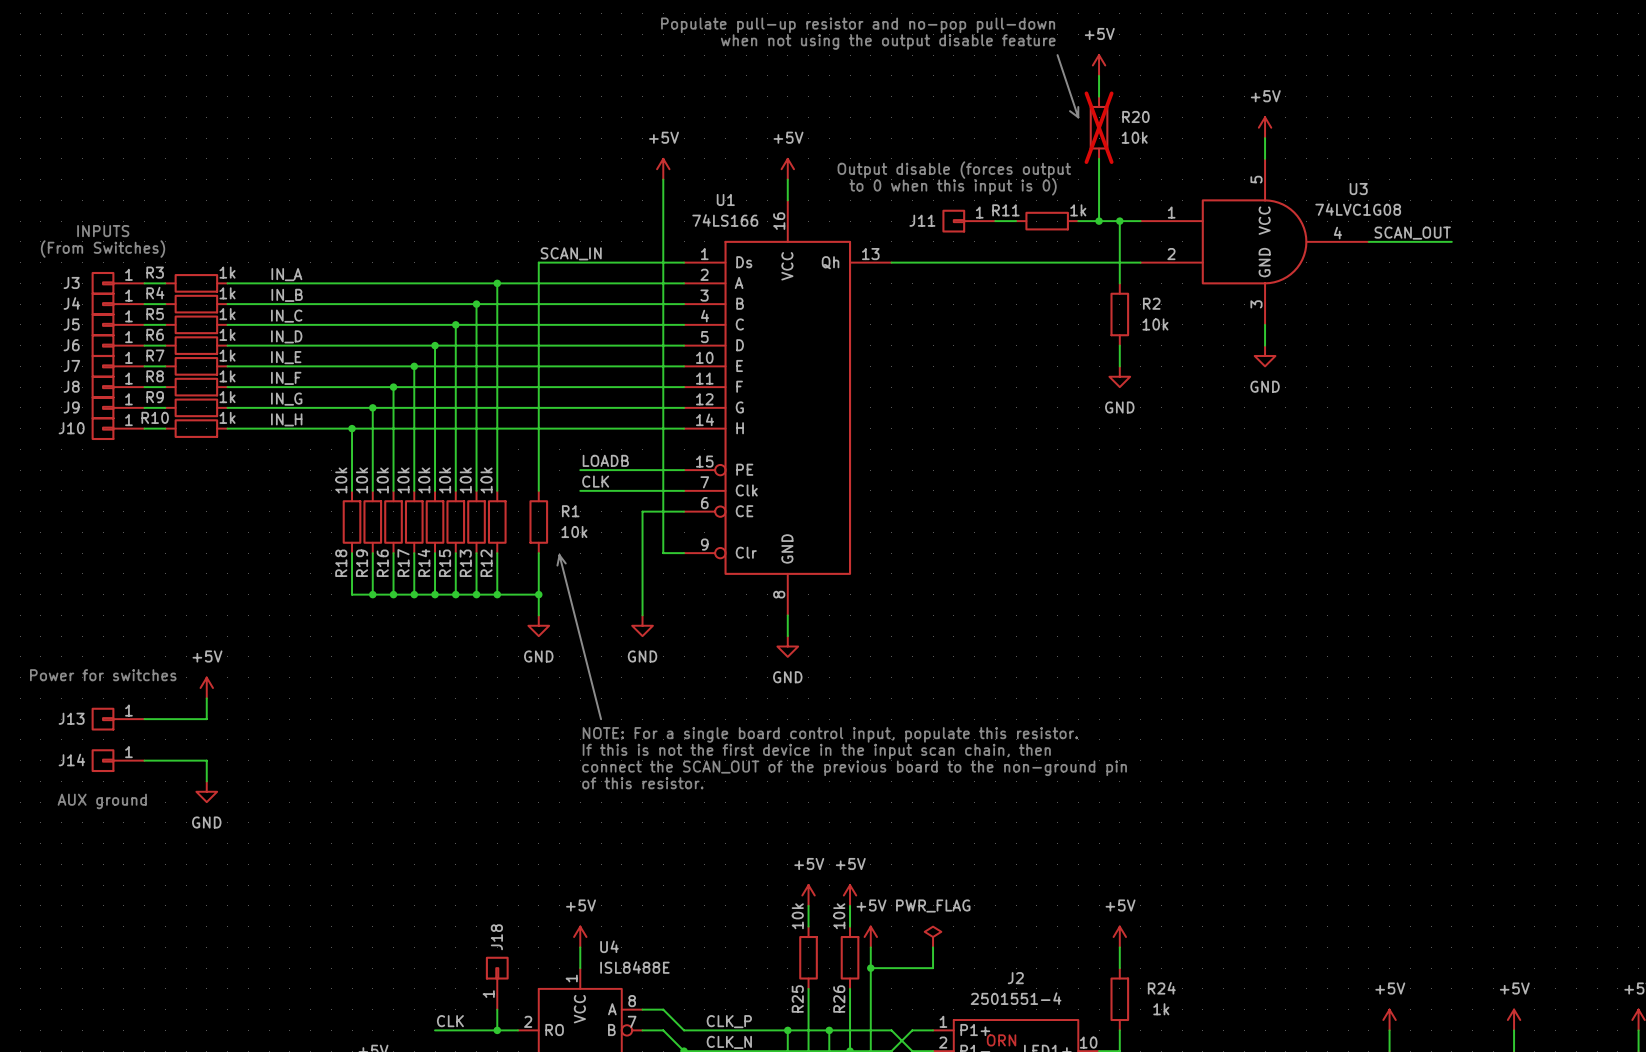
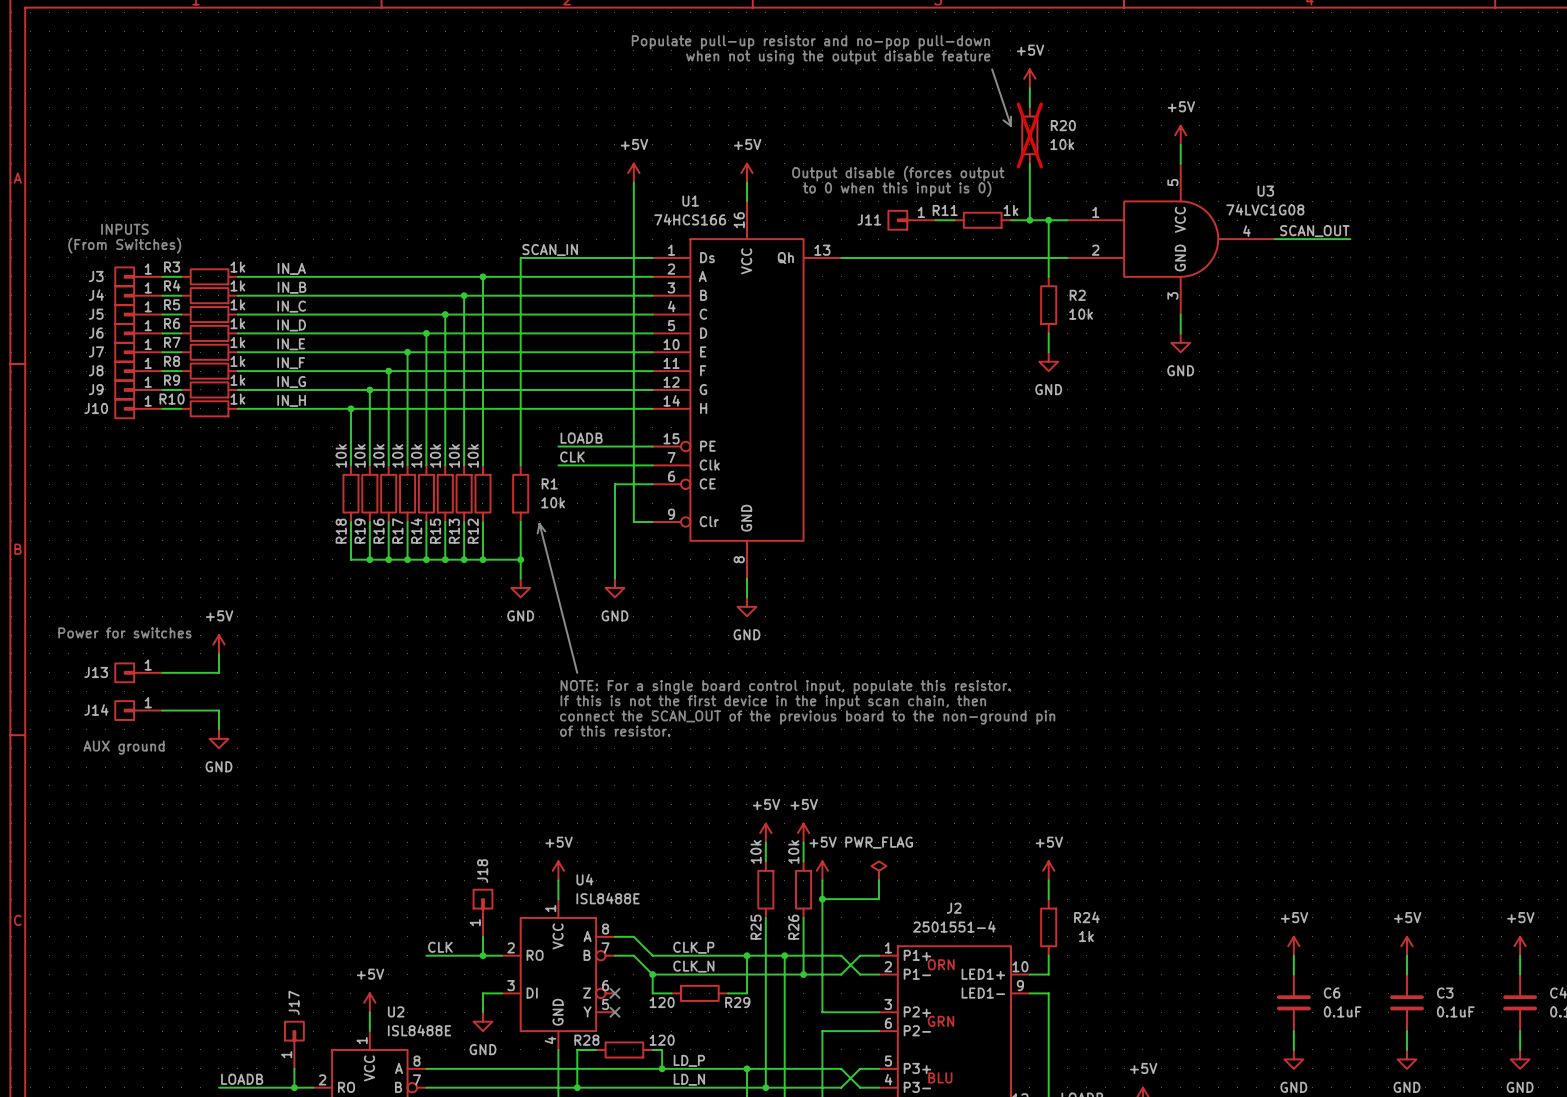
U1 value: 74LS166 (725, 220) -> 74HCS166 (690, 219)

